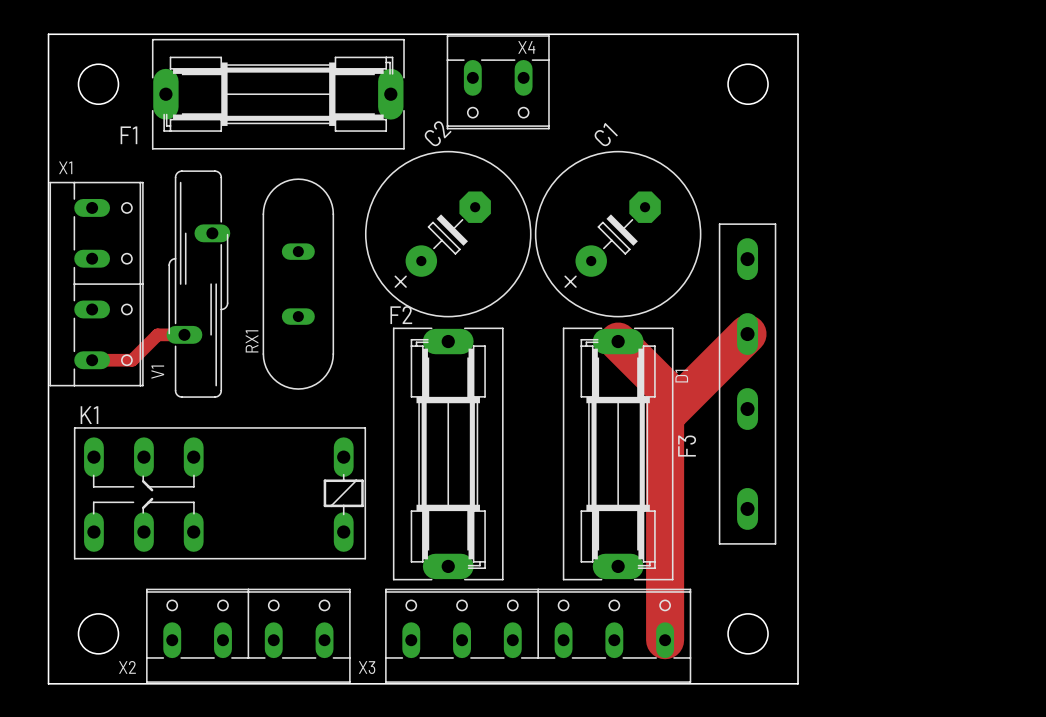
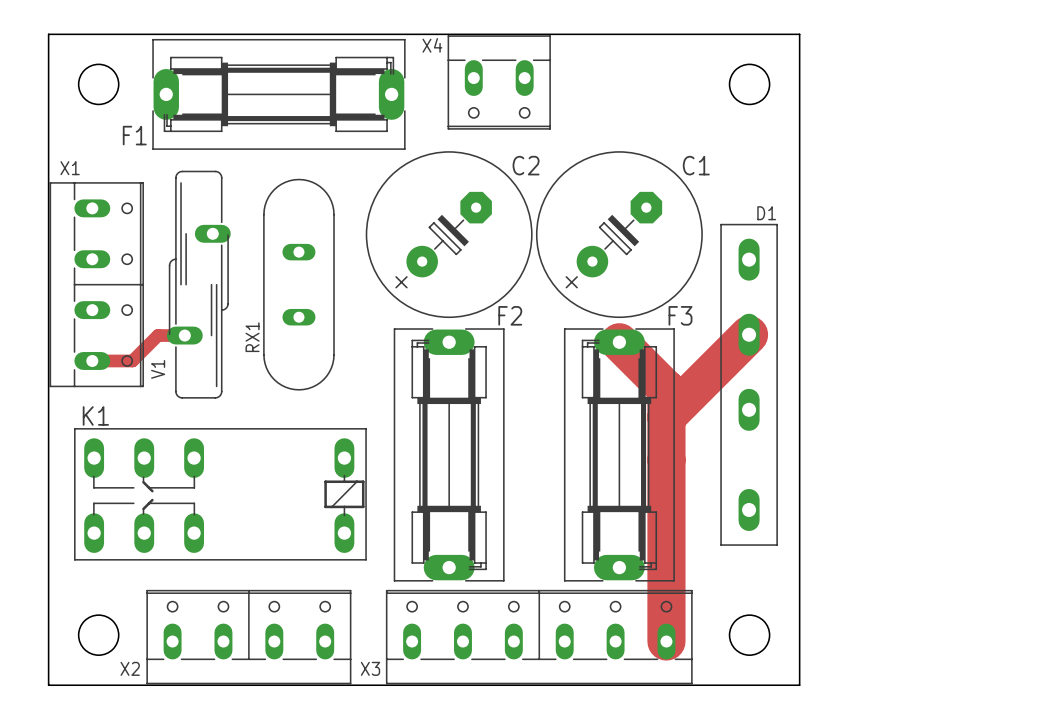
X4 name position: X4 (526, 47) -> X4 (432, 45)
C2 name rotation: 0° (438, 133) -> 45° clockwise (526, 165)
C2 name position: C2 (438, 133) -> C2 (526, 165)
C1 name rotation: 0° (606, 134) -> 45° clockwise (696, 165)
C1 name position: C1 (606, 134) -> C1 (696, 165)
F2 name position: F2 (401, 315) -> F2 (510, 315)
D1 name rotation: 0° (681, 376) -> 90° clockwise (766, 213)
D1 name position: D1 (681, 376) -> D1 (766, 213)
F3 name rotation: 0° (687, 446) -> 90° clockwise (680, 315)
F3 name position: F3 (687, 446) -> F3 (680, 315)

